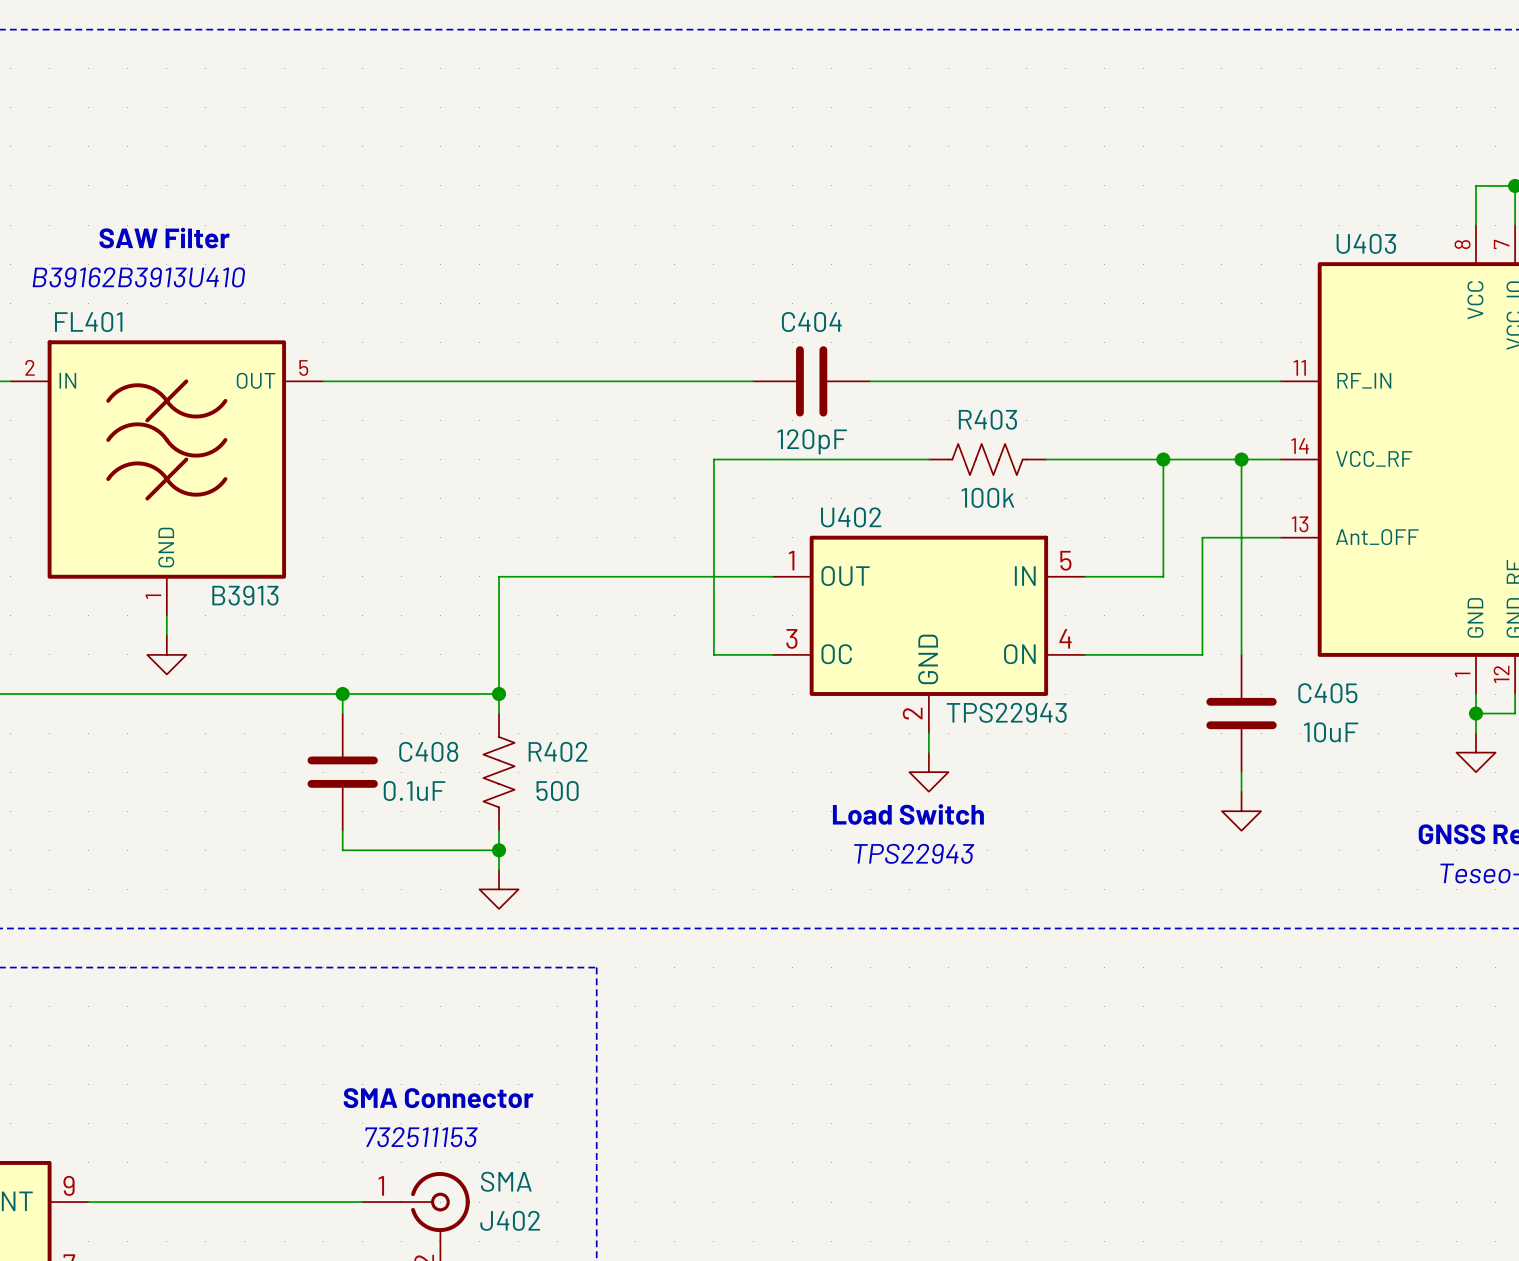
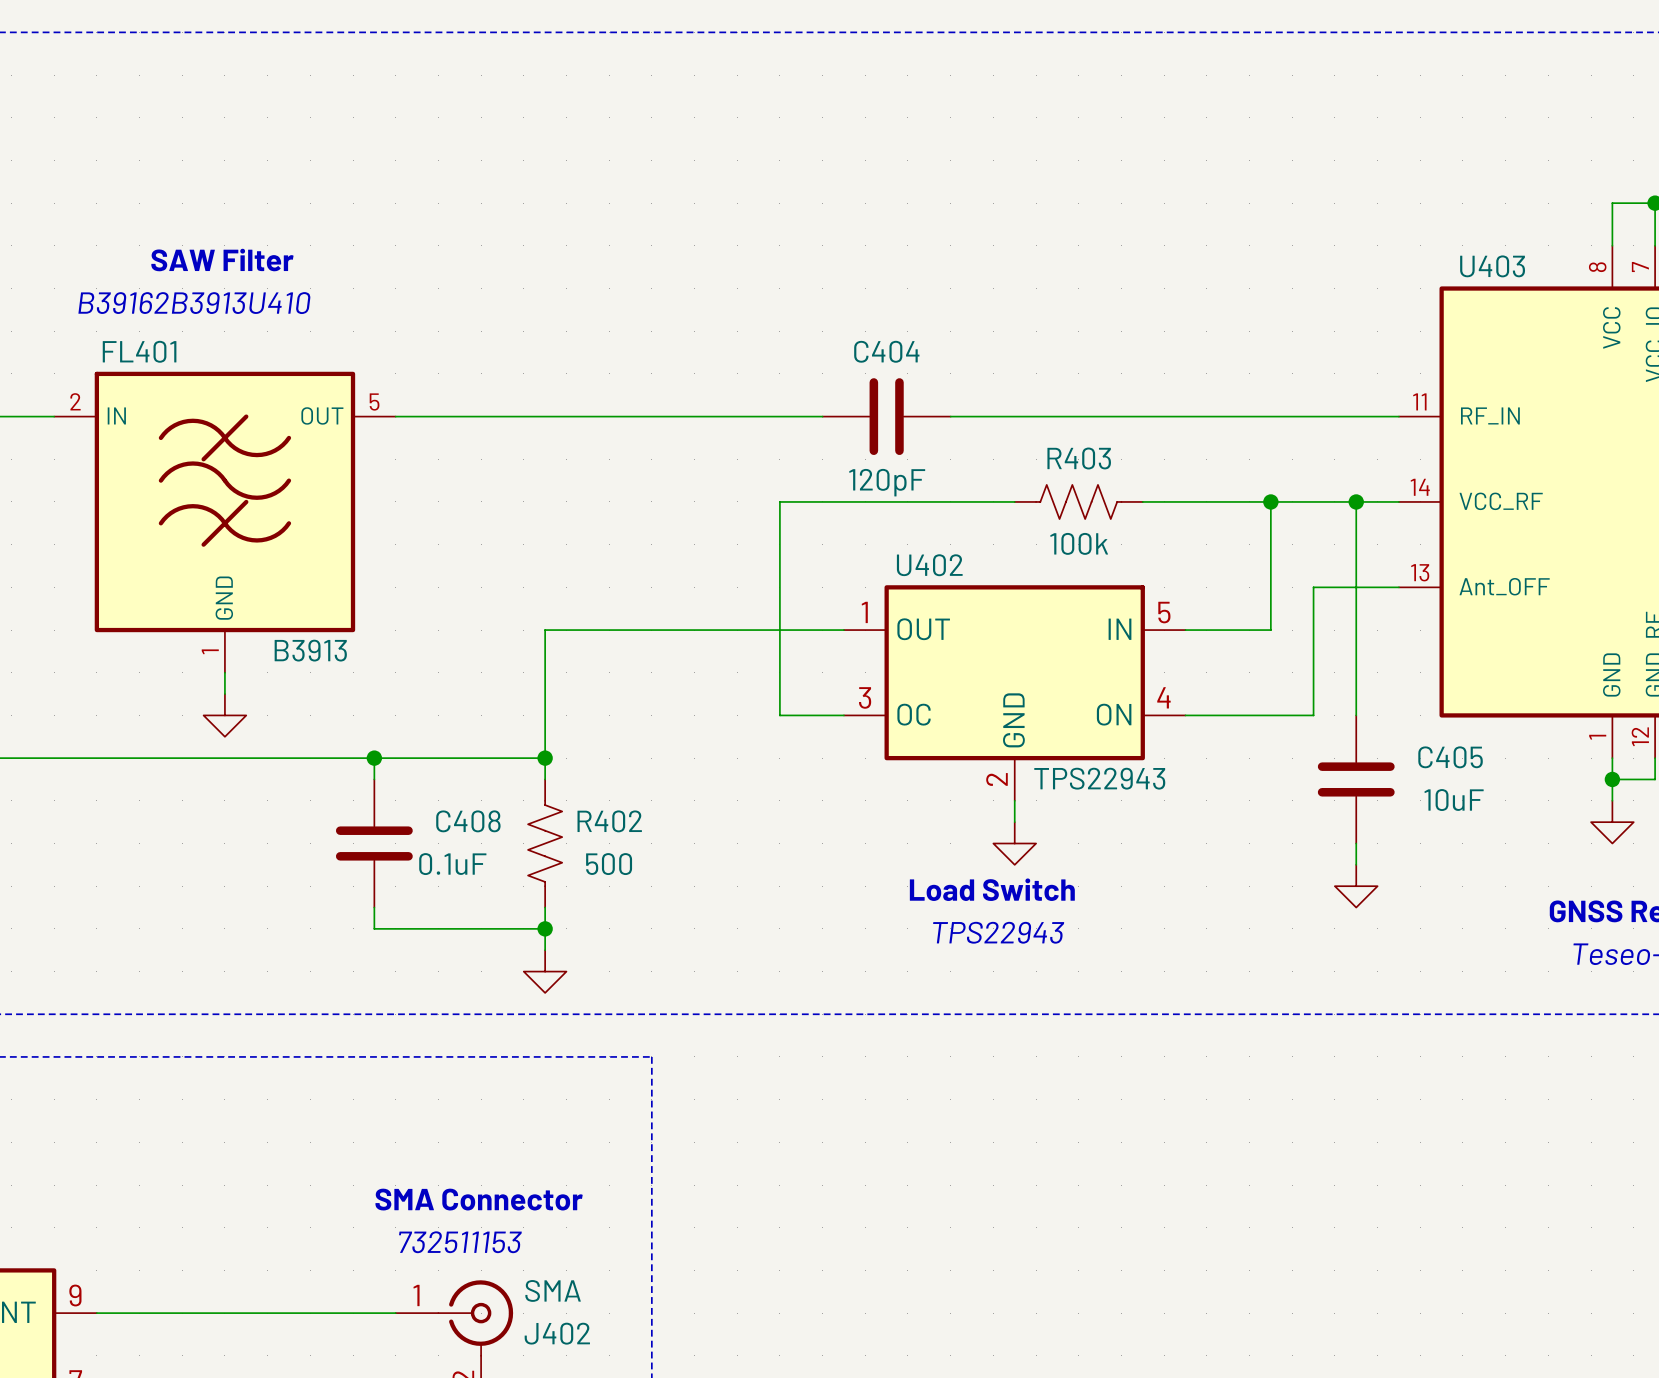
text position: SAW Filter (164, 238) -> SAW Filter (222, 260)
text position: B39162B3913U410 (138, 277) -> B39162B3913U410 (194, 303)
FL401 position: (166, 478) -> (224, 522)
wire: (166, 615) (166, 635) -> (224, 672) (224, 694)
power symbol position: (166, 654) -> (224, 715)

